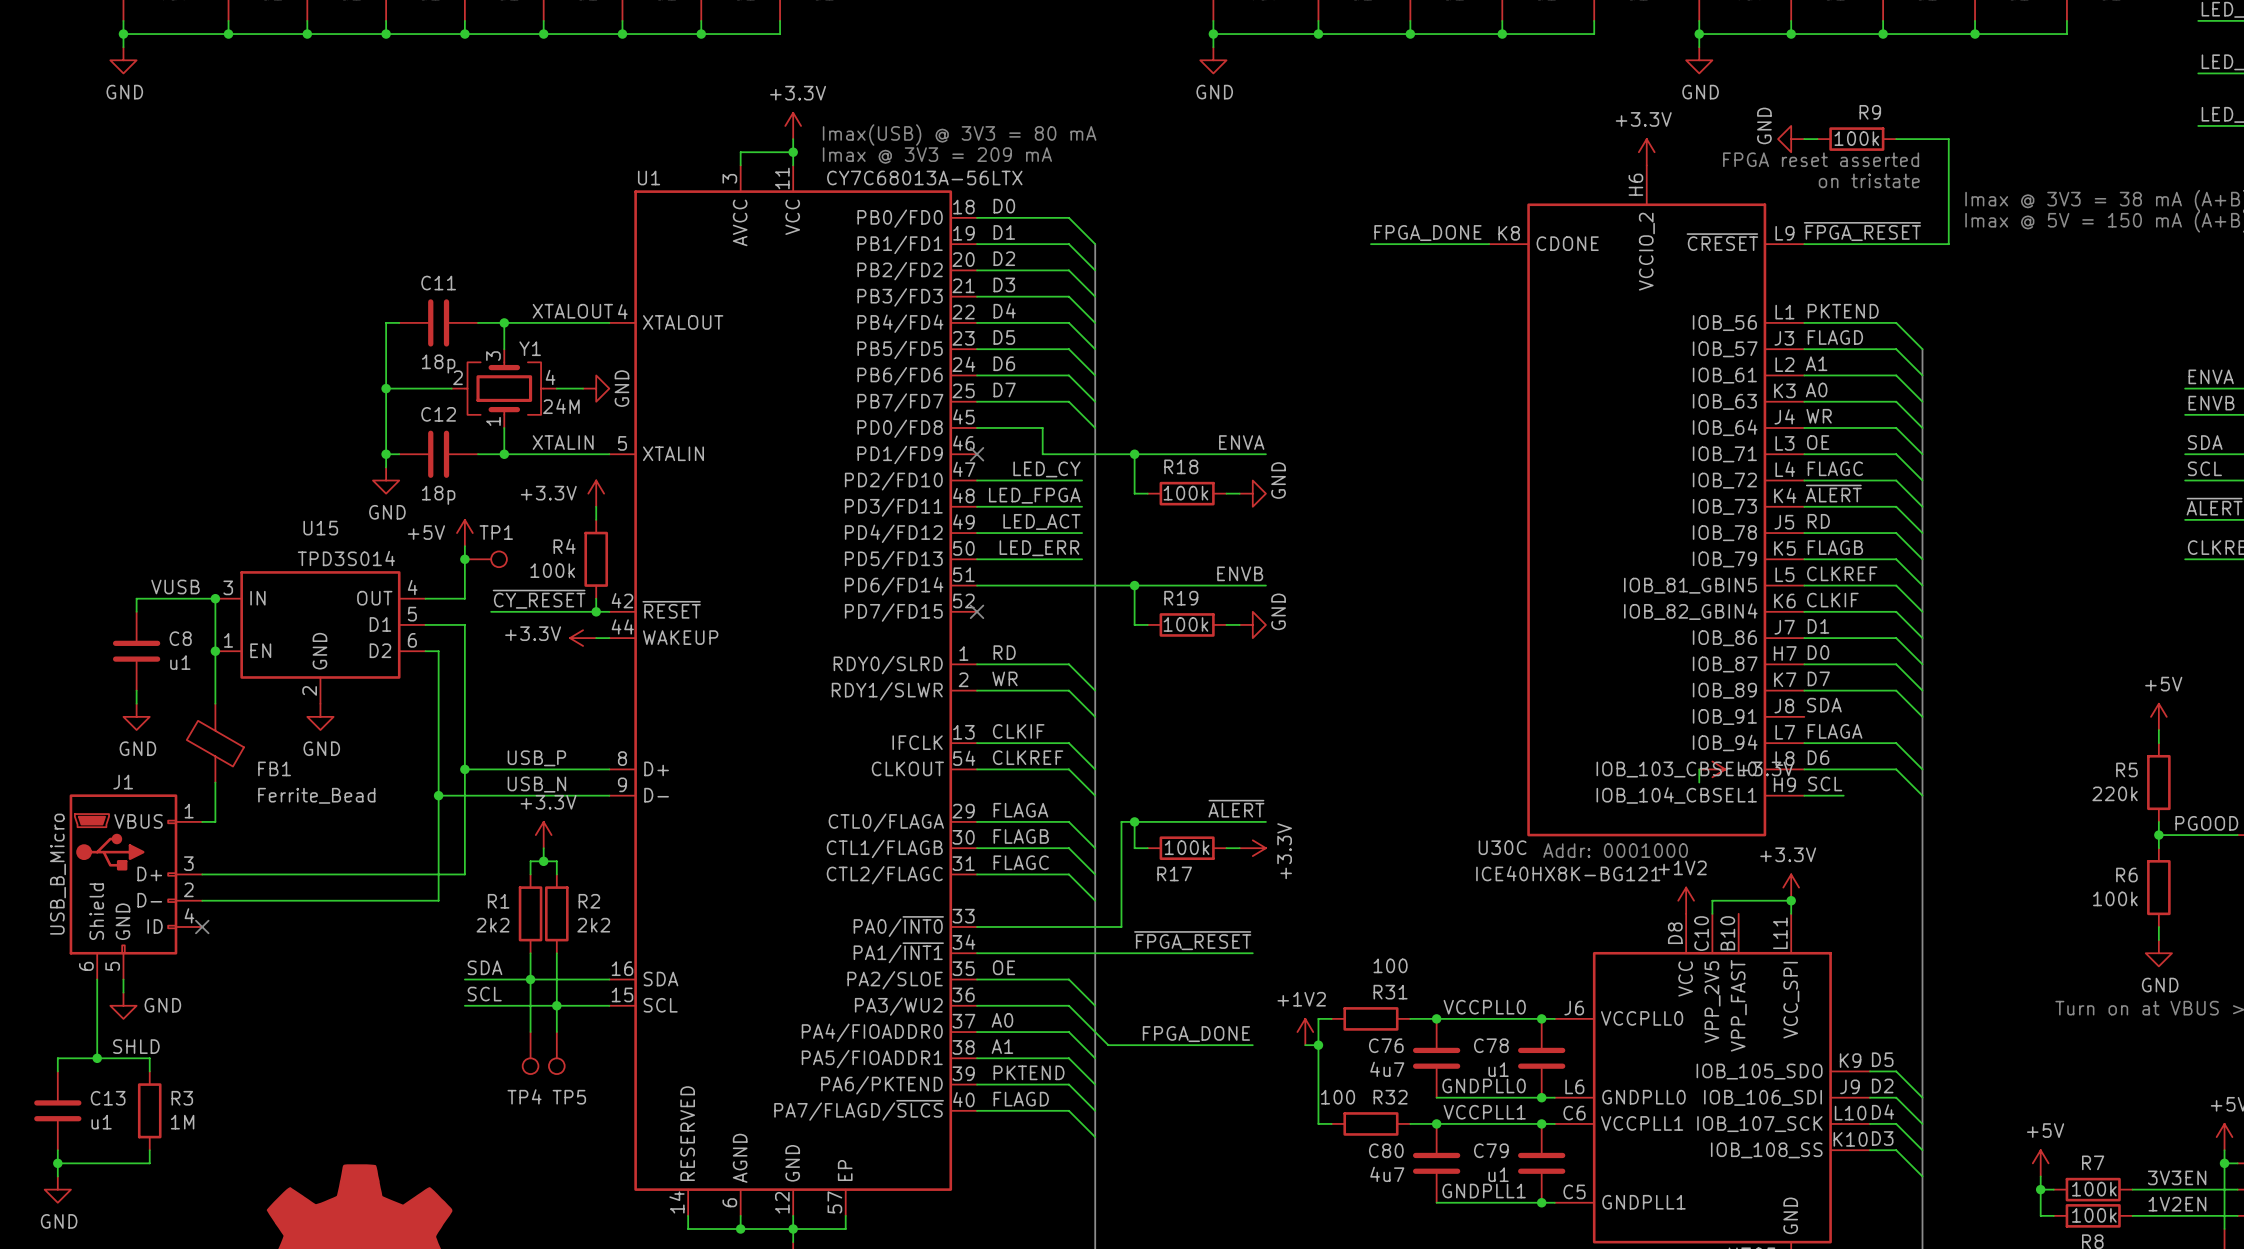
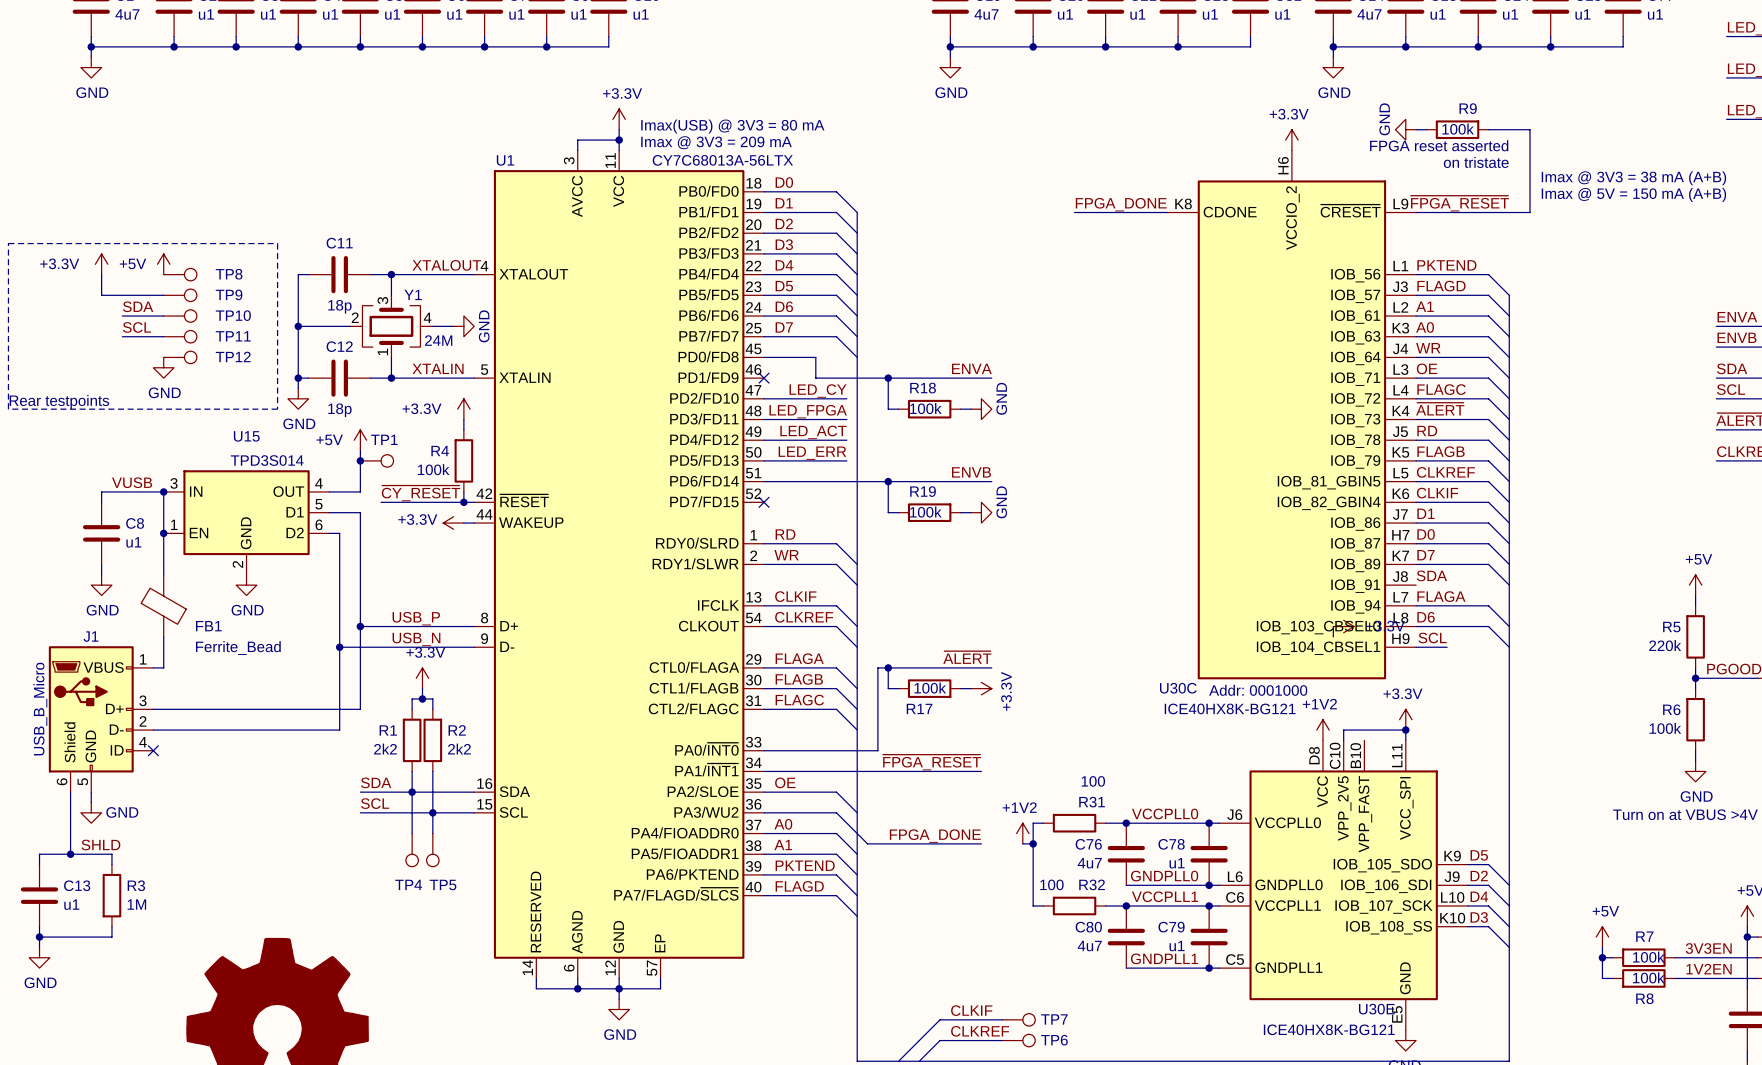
line: none -> (8, 243) (277, 243) (277, 409) (8, 409) (8, 243)
power symbol: none -> +3.3V (101, 264)
power symbol: none -> +5V (163, 264)
wire: none -> (101, 274) (101, 295) (163, 295)
TP8: none -> (180, 274)
TP9: none -> (180, 295)
label: none -> SDA (138, 306)
wire: none -> (122, 316) (163, 316)
TP10: none -> (180, 316)
label: none -> SCL (137, 327)
wire: none -> (122, 336) (163, 336)
TP11: none -> (180, 336)
TP12: none -> (180, 357)
power symbol: none -> GND (163, 367)
text: none -> Rear testpoints (59, 401)

